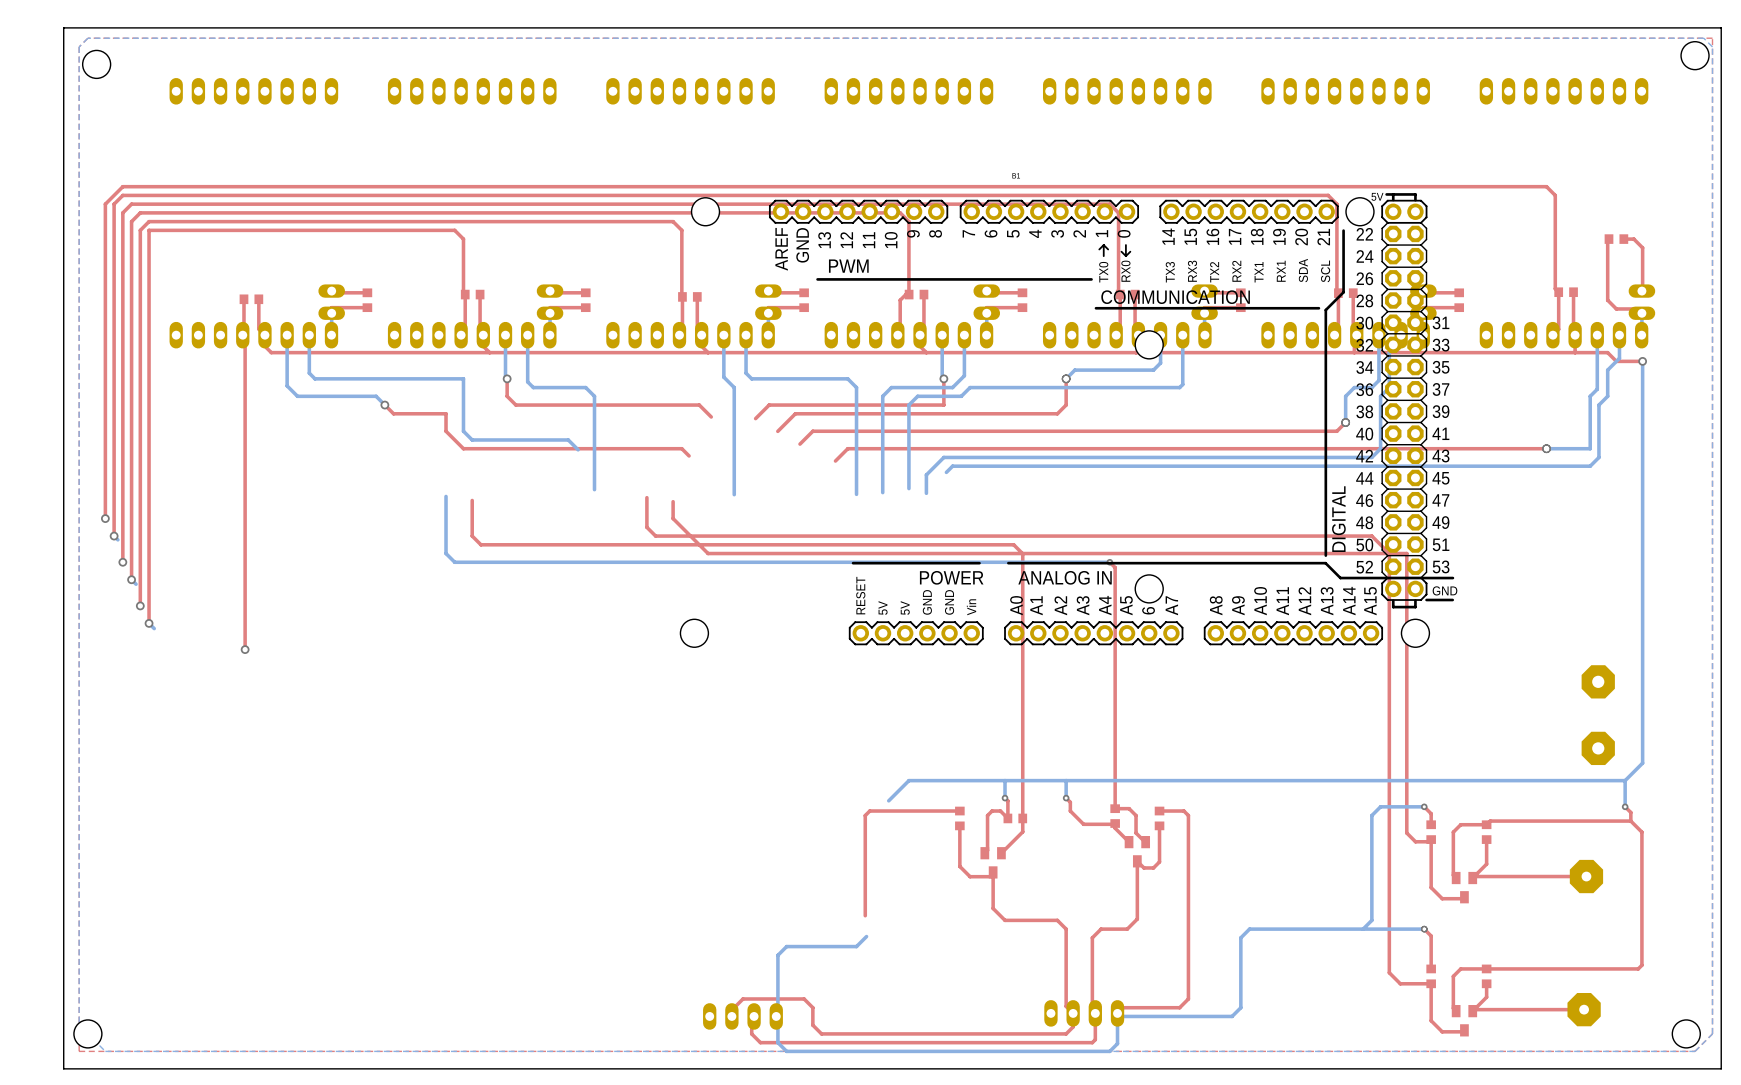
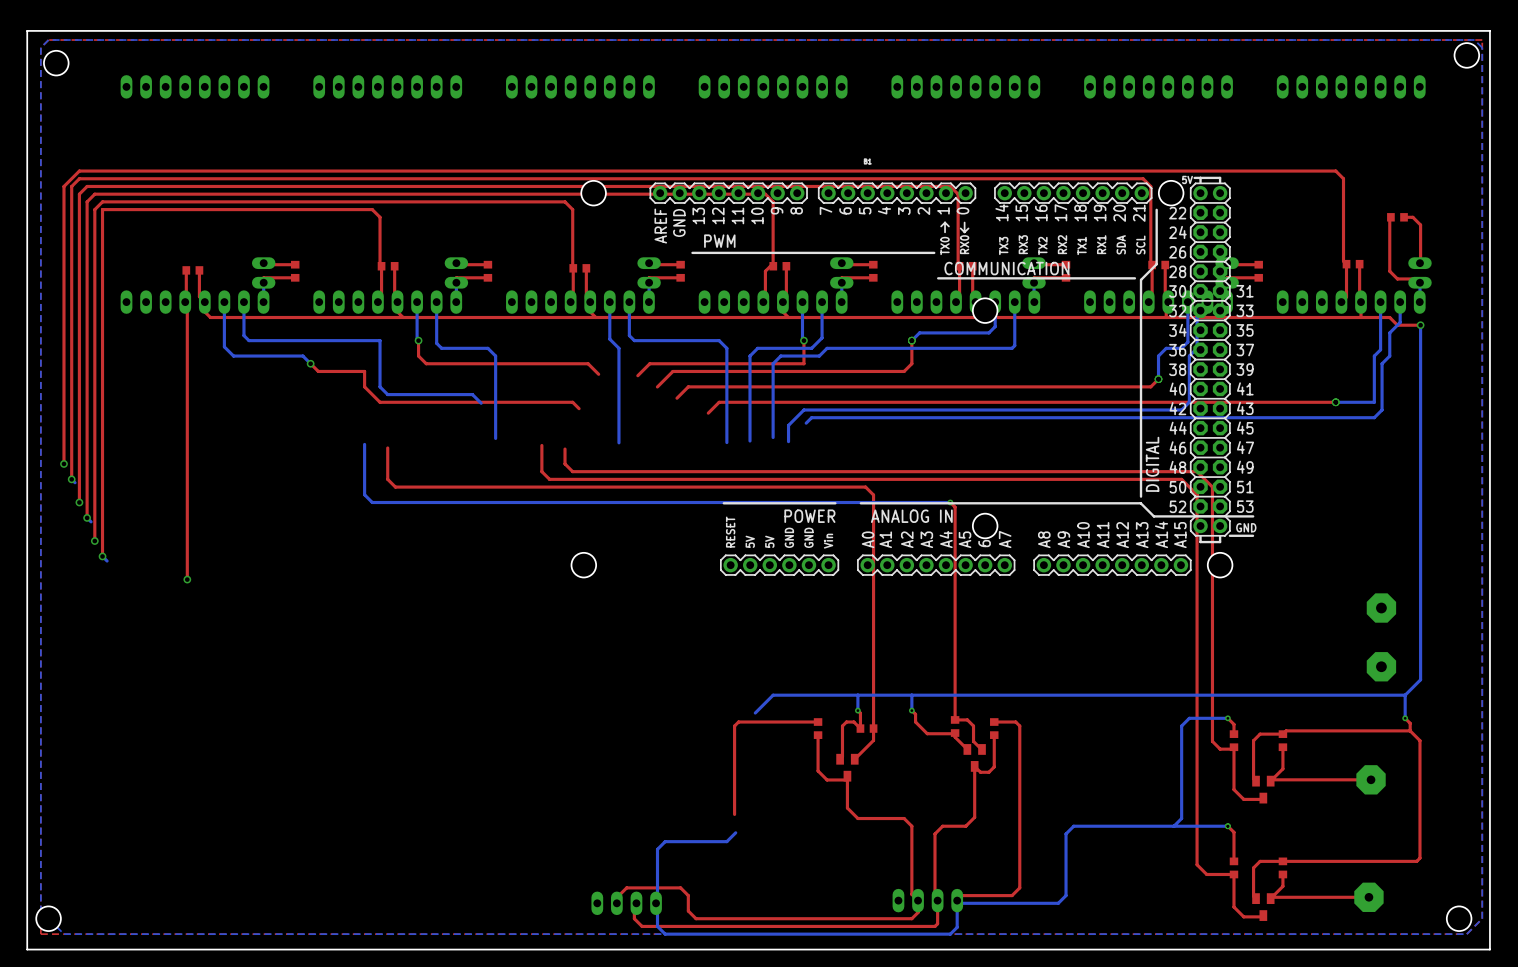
top track: (681, 527) (708, 553) (1406, 553) -> (572, 471) (1197, 471) (1212, 487) (1212, 494)

